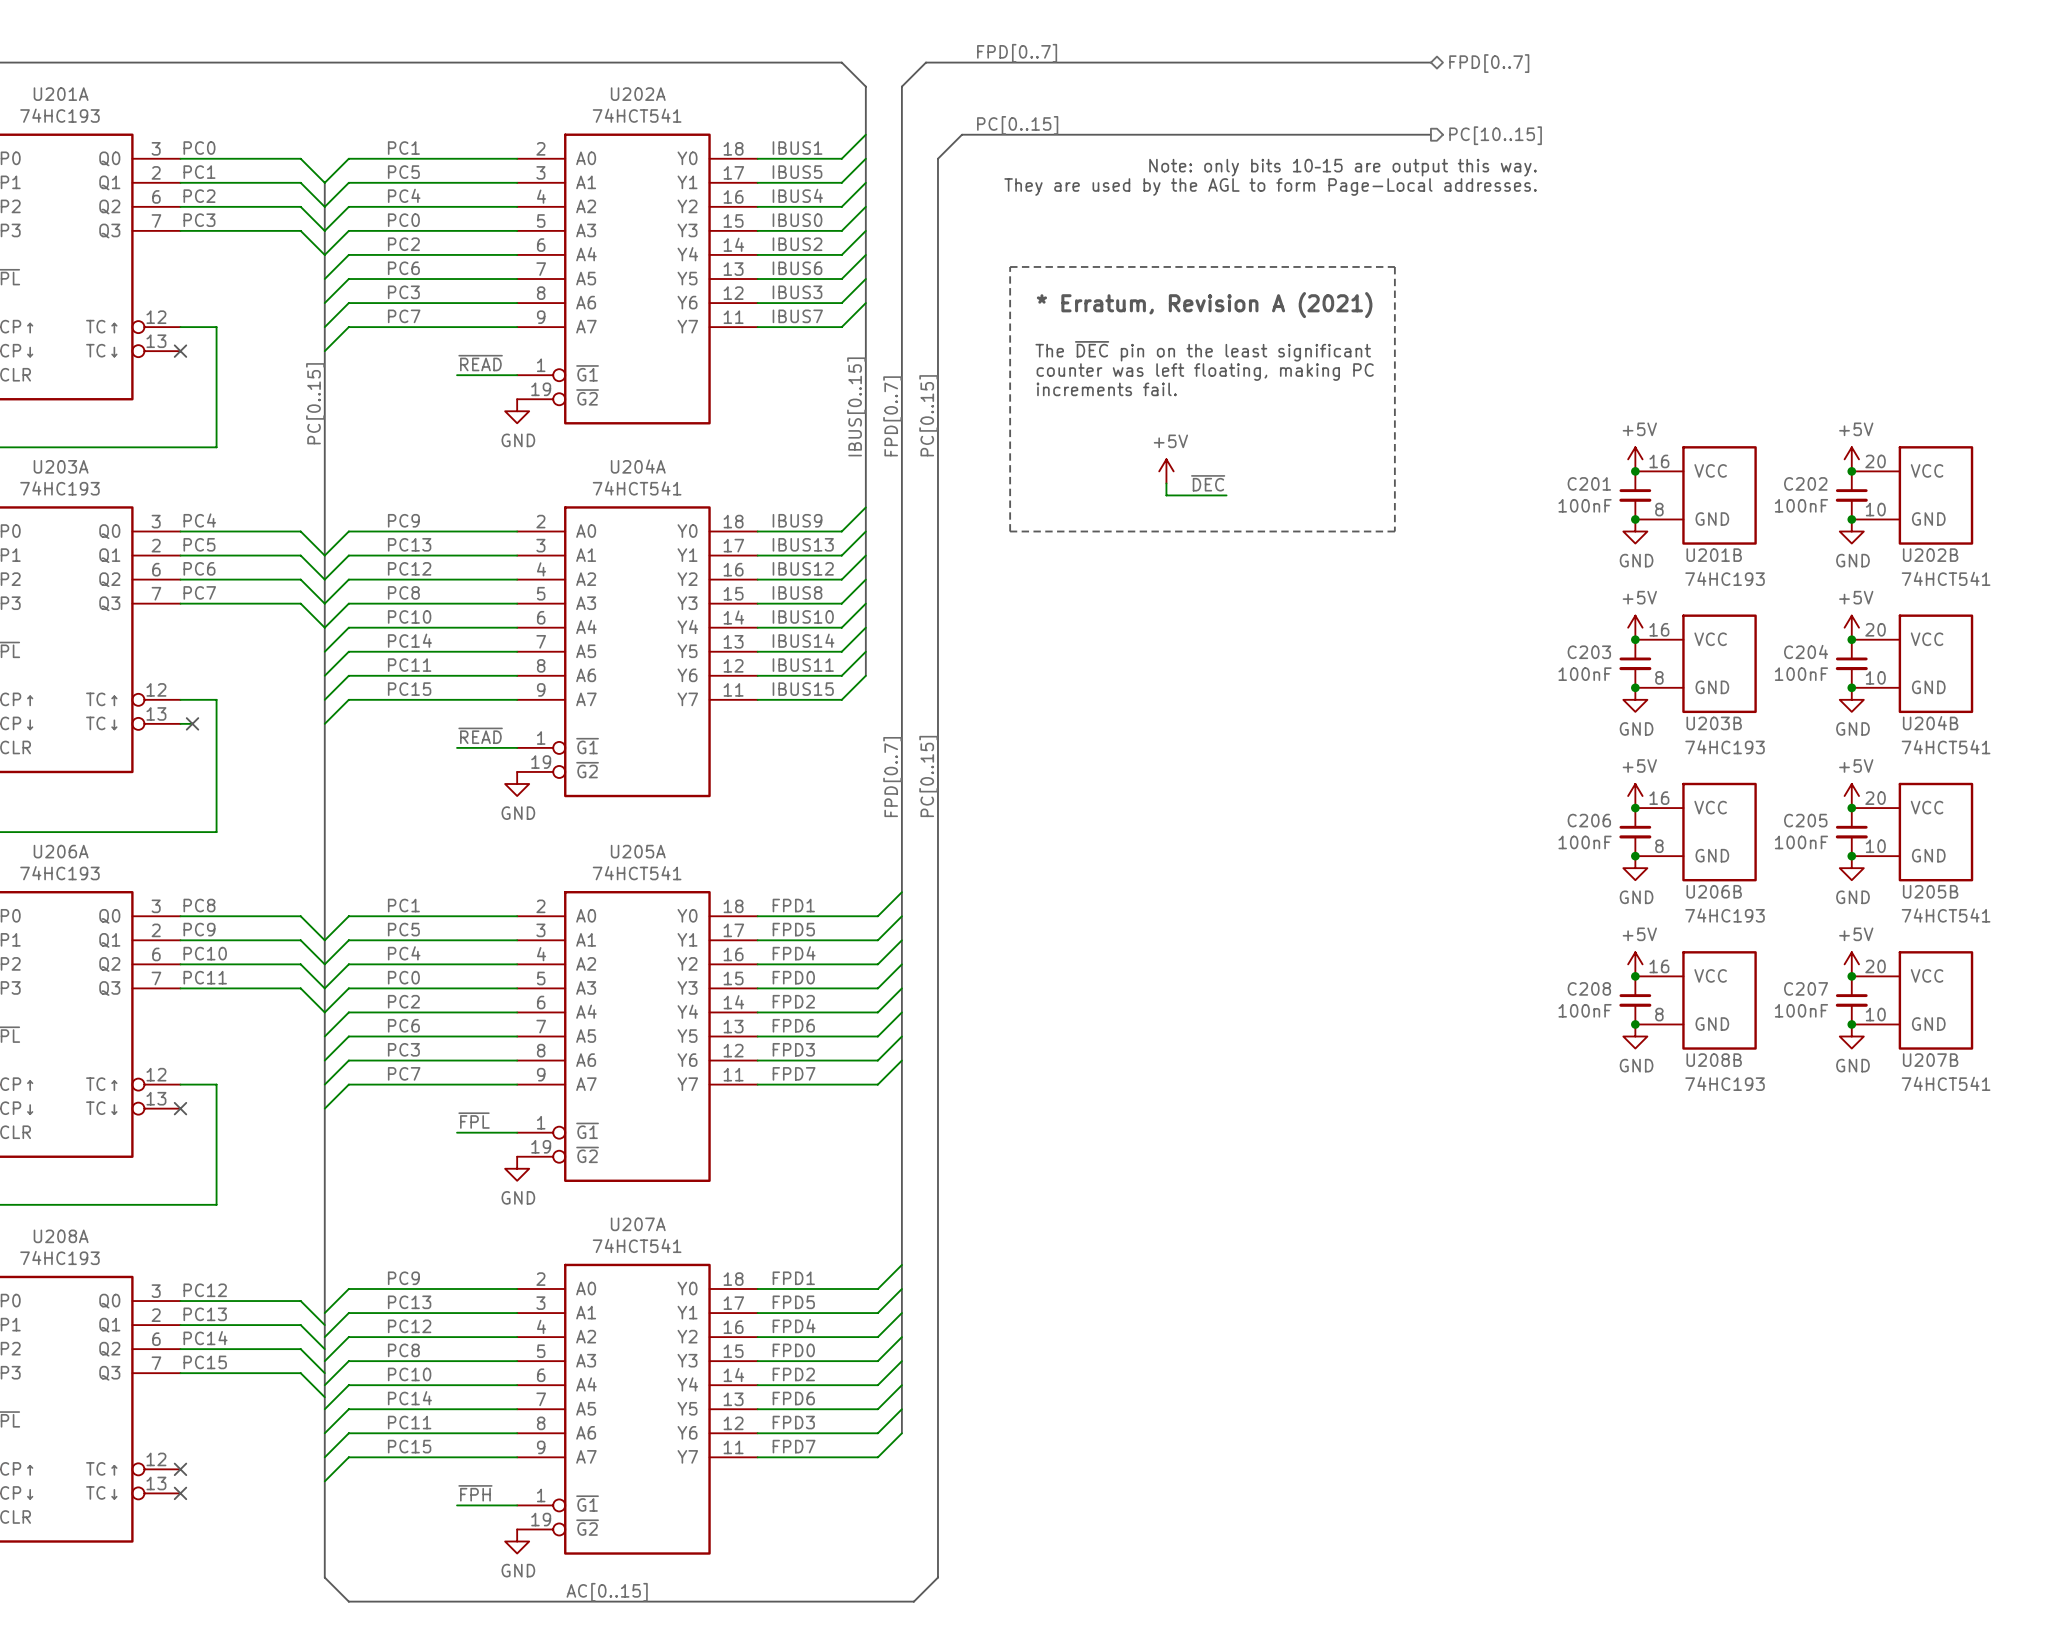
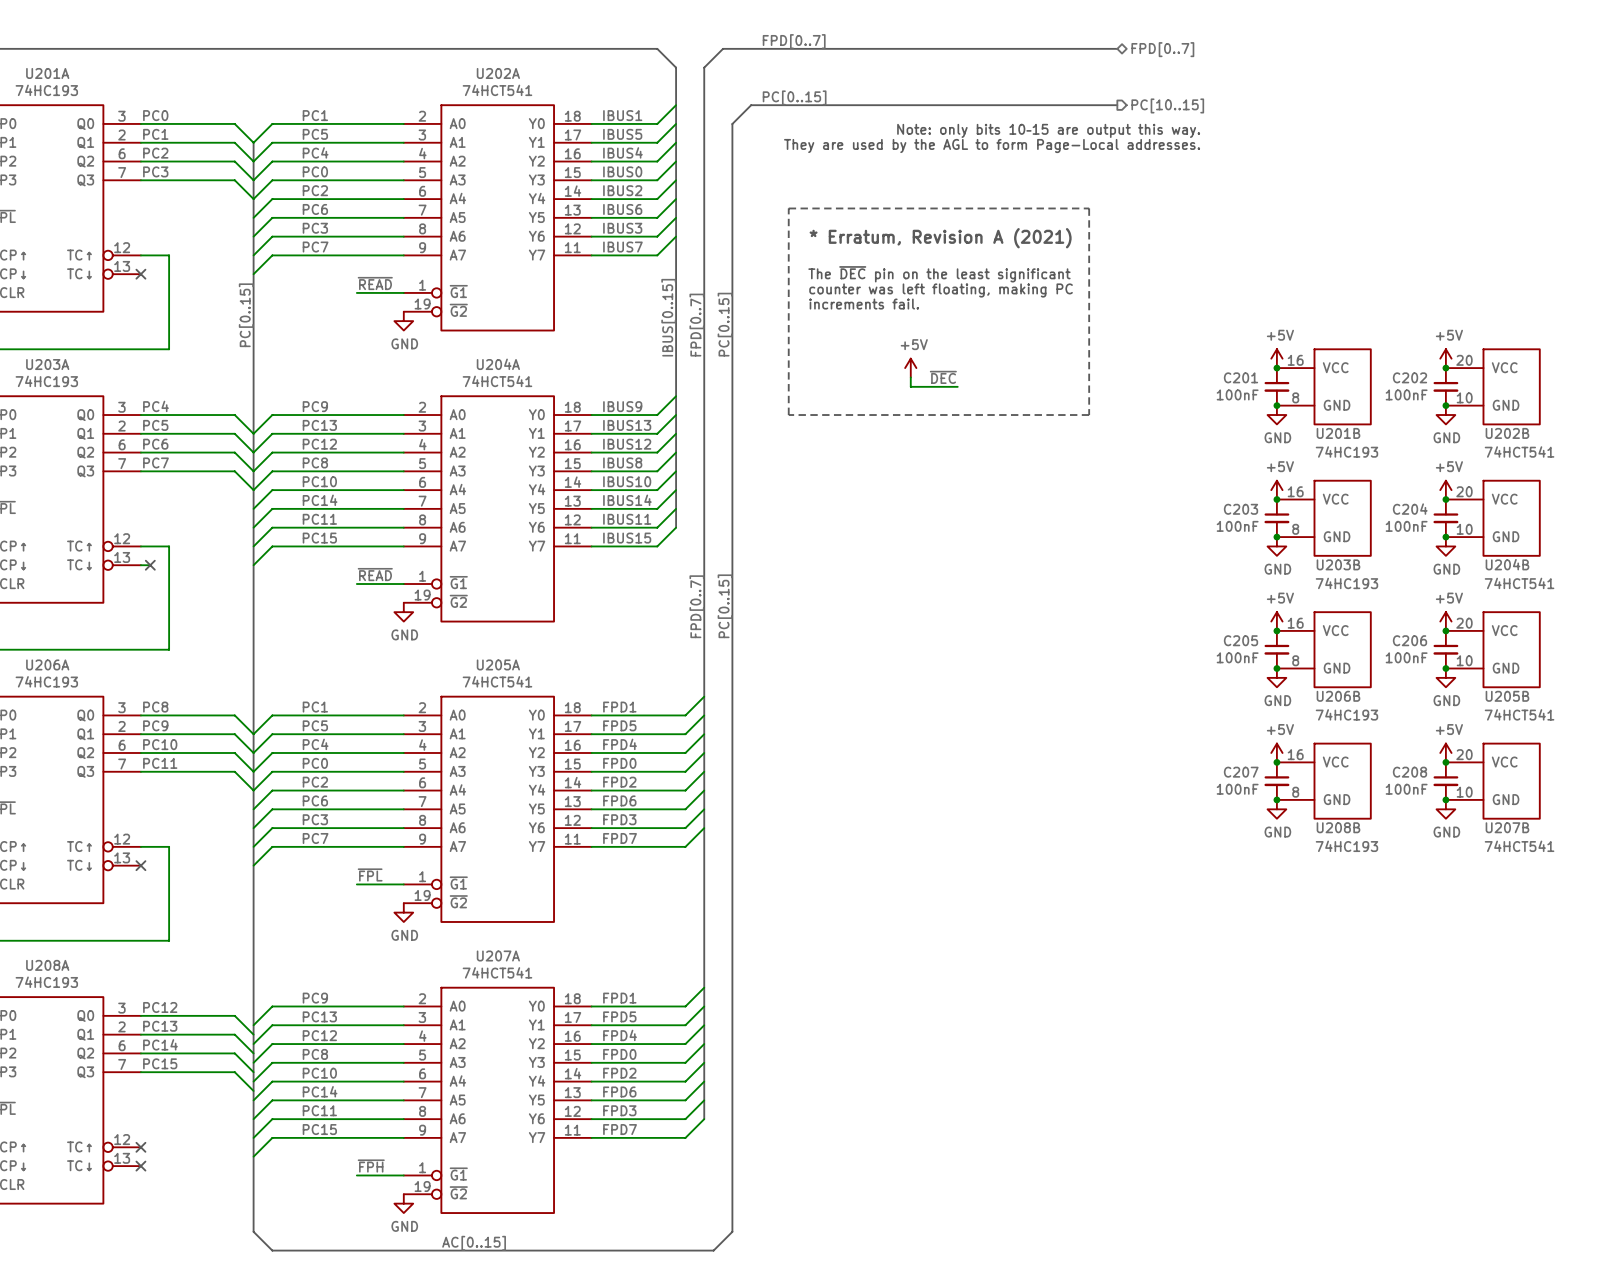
C206 name: C206 (1589, 820) -> C205 (1241, 640)
C205 name: C205 (1805, 820) -> C206 (1409, 640)
C208 name: C208 (1589, 988) -> C207 (1241, 772)
C207 name: C207 (1806, 988) -> C208 (1409, 772)

